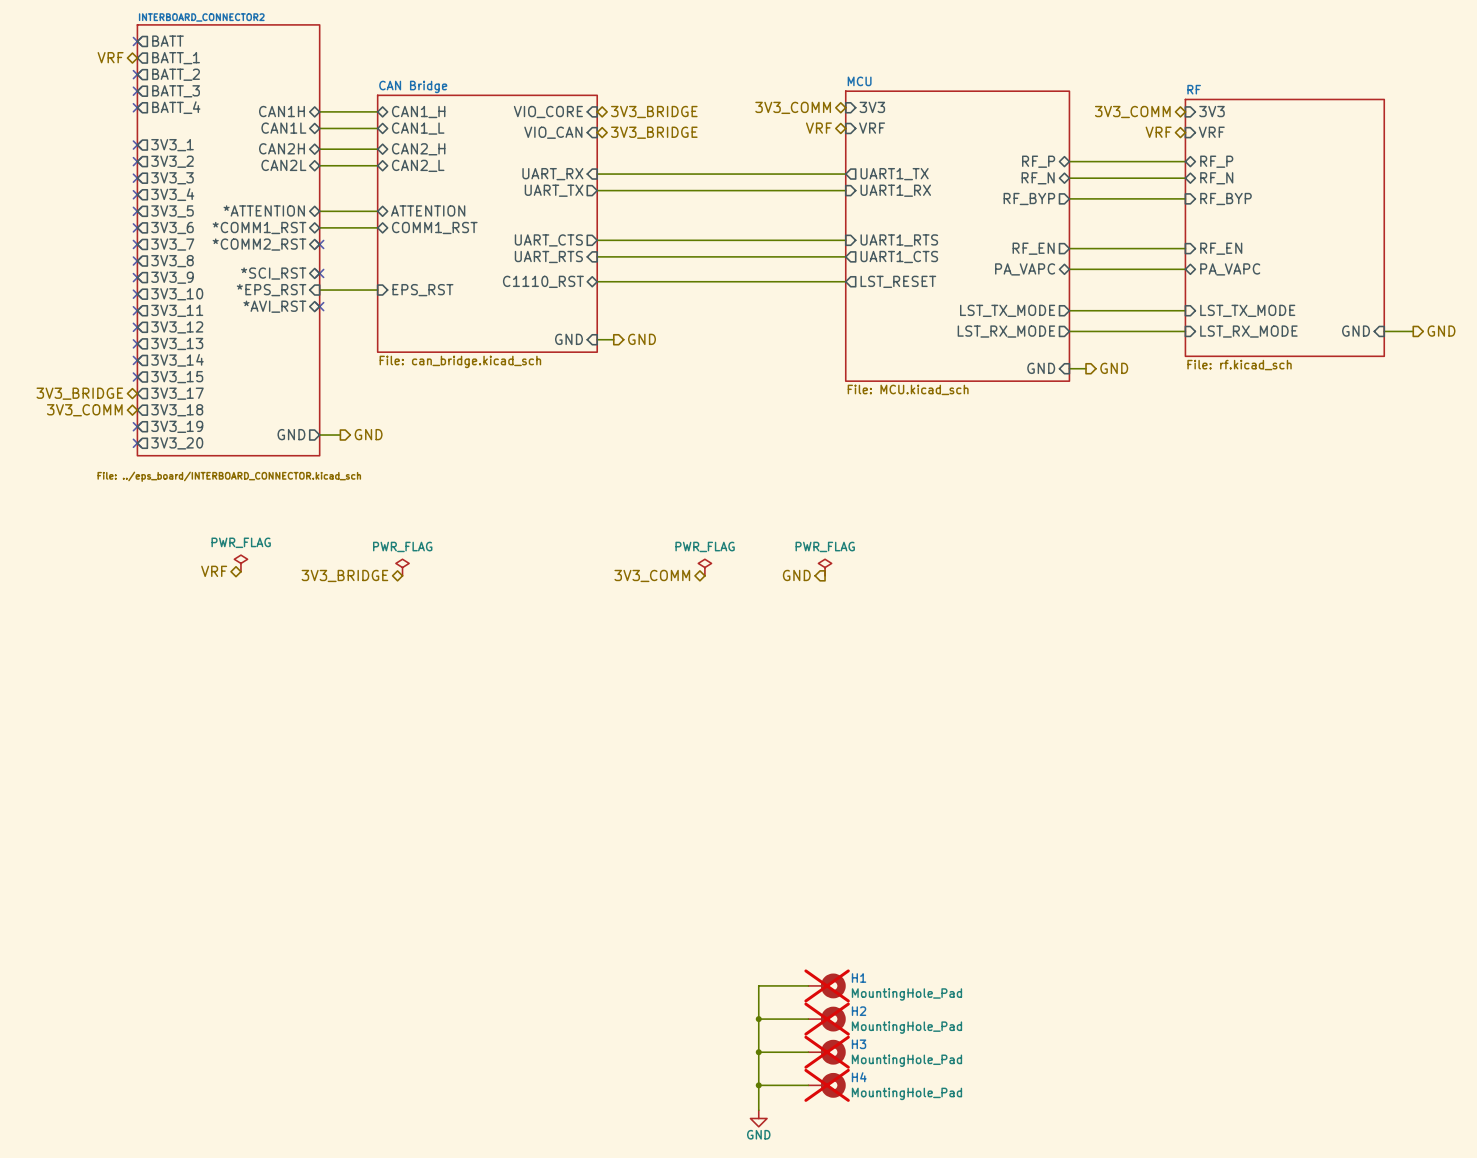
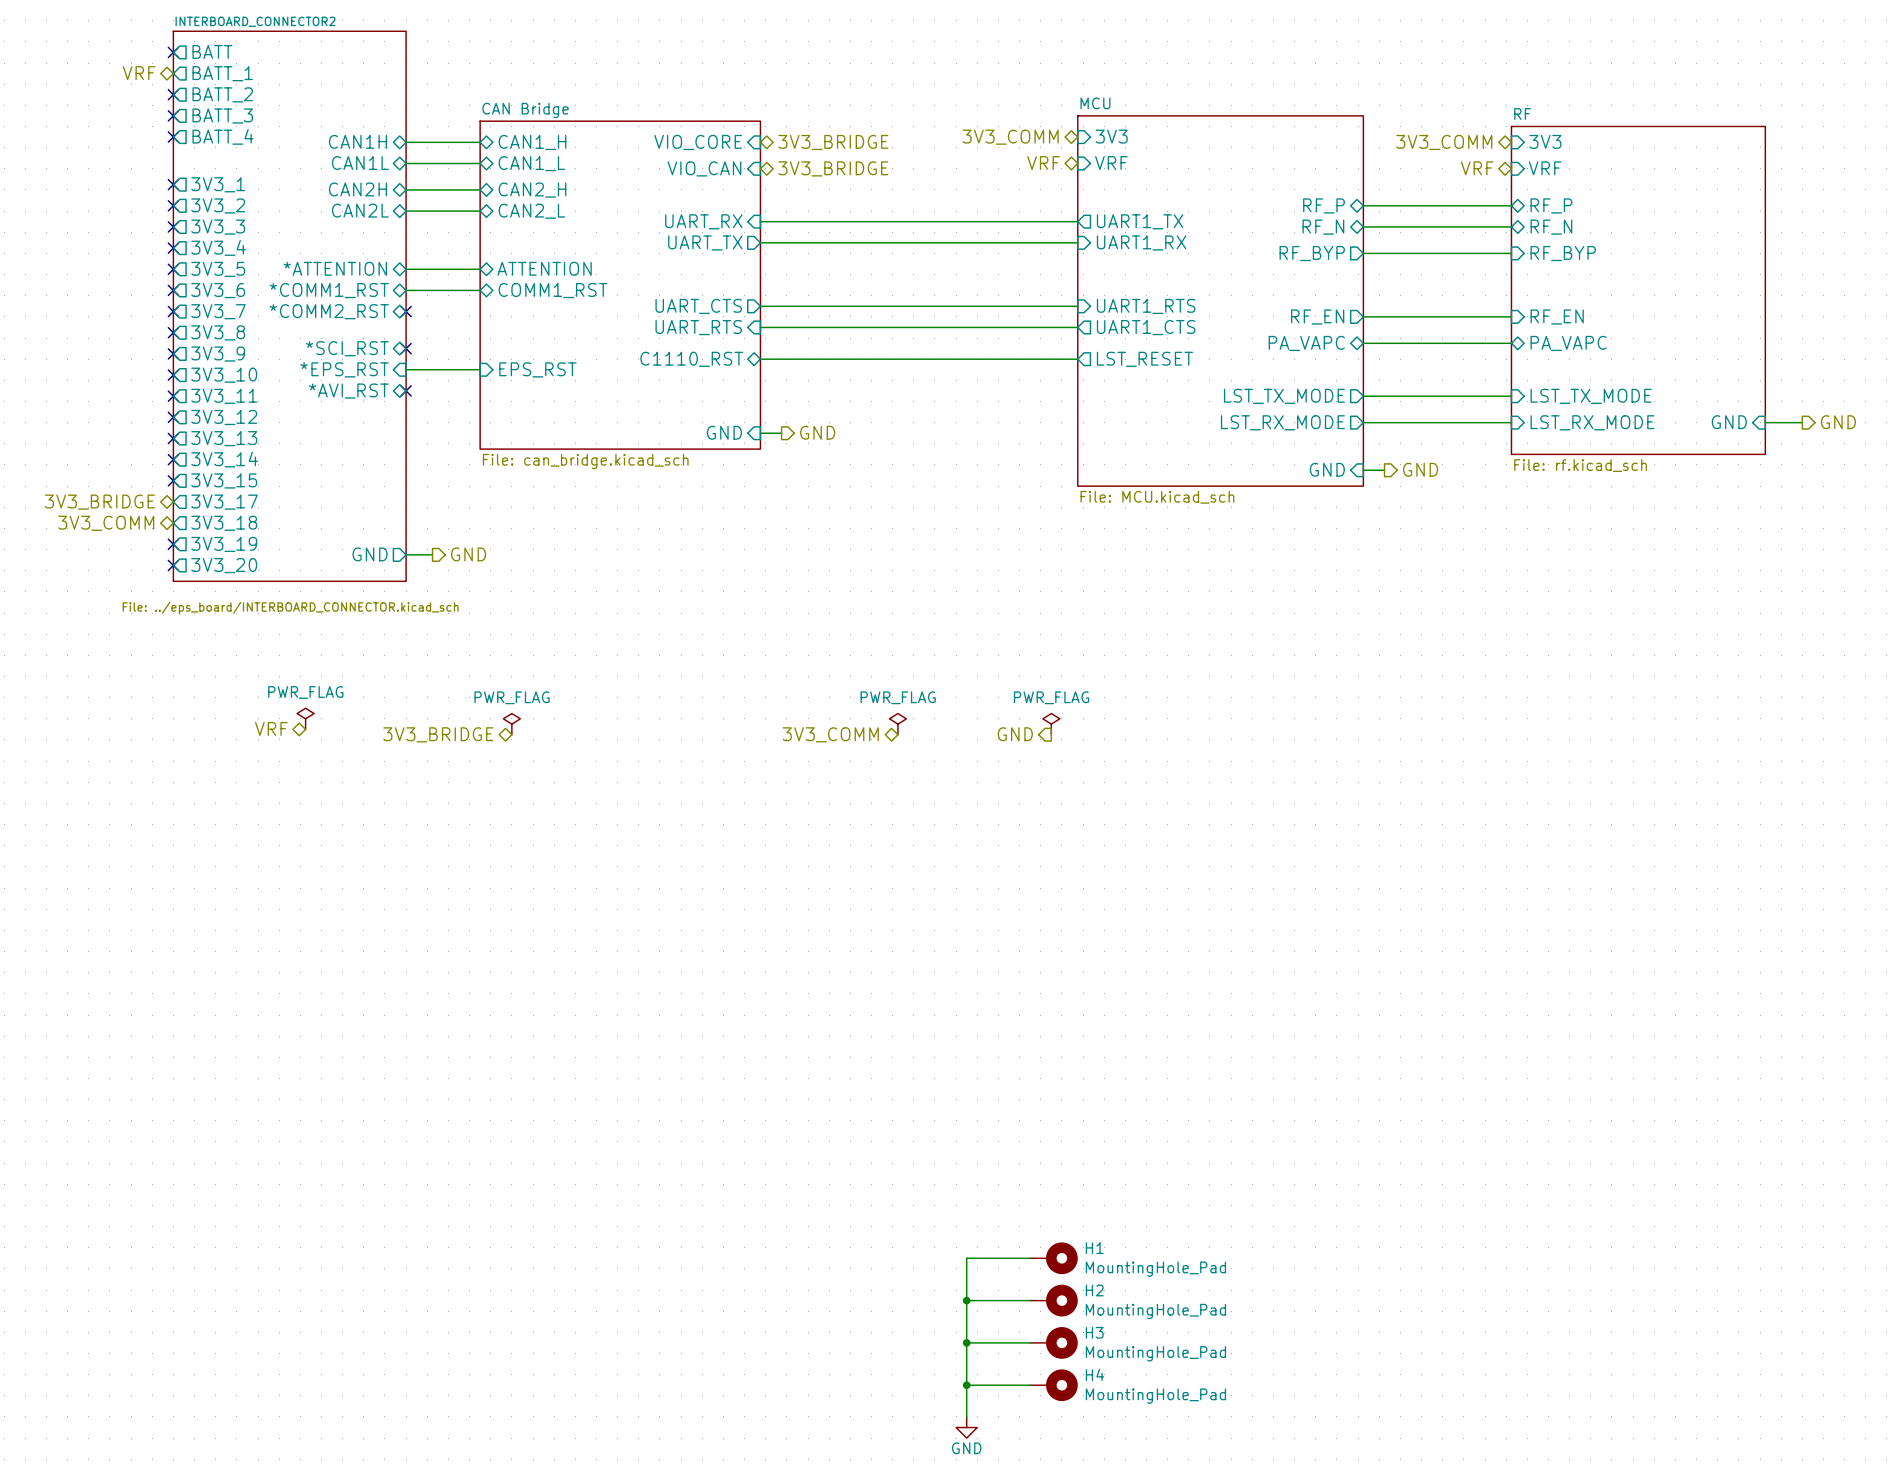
H1 do-not-place cross: (827, 985) -> none
H2 do-not-place cross: (827, 1019) -> none
H3 do-not-place cross: (827, 1052) -> none
H4 do-not-place cross: (827, 1085) -> none

